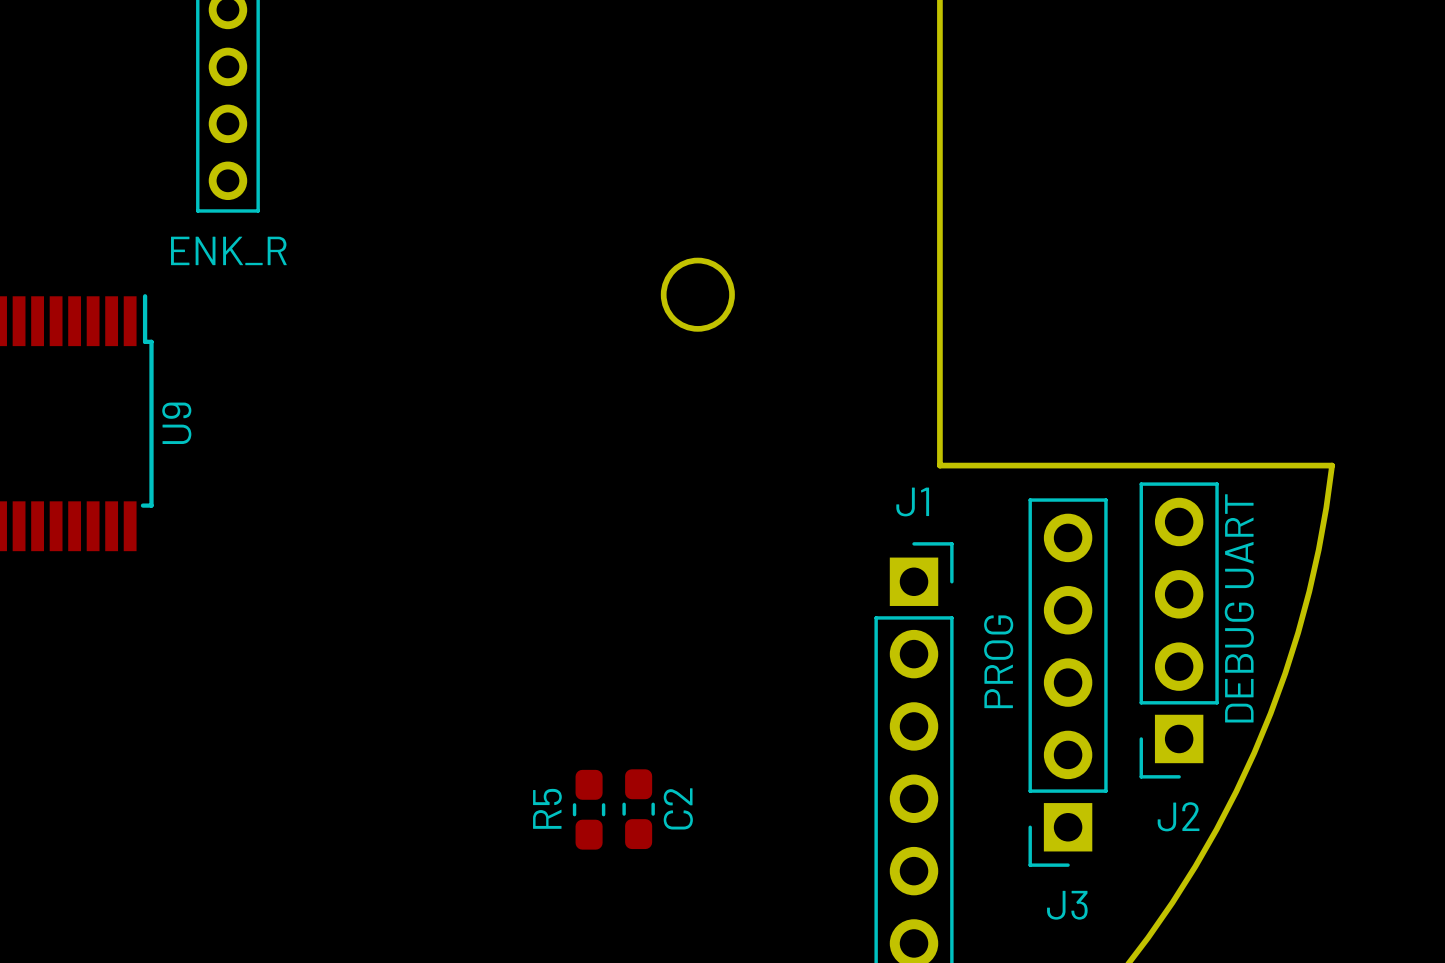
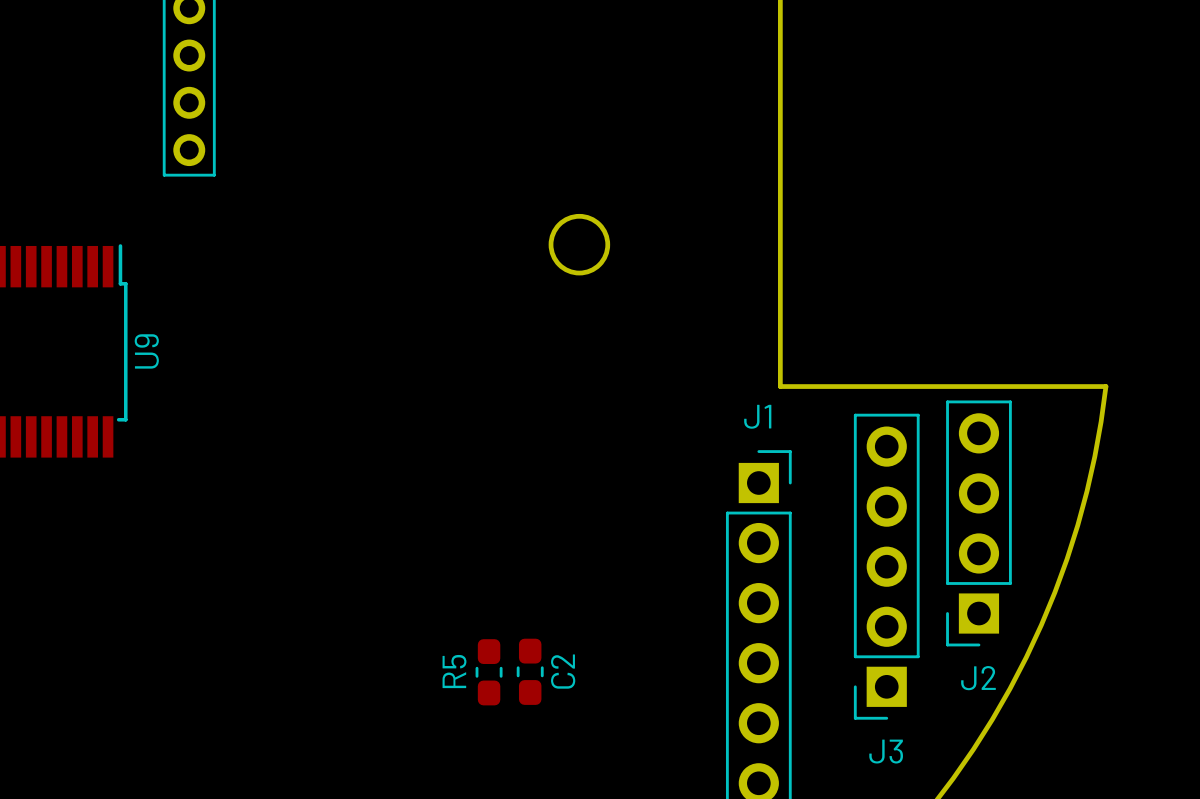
part value: ENK_R (228, 250) -> none
J2 value: DEBUG UART (1239, 608) -> none
J3 value: PROG (998, 661) -> none

